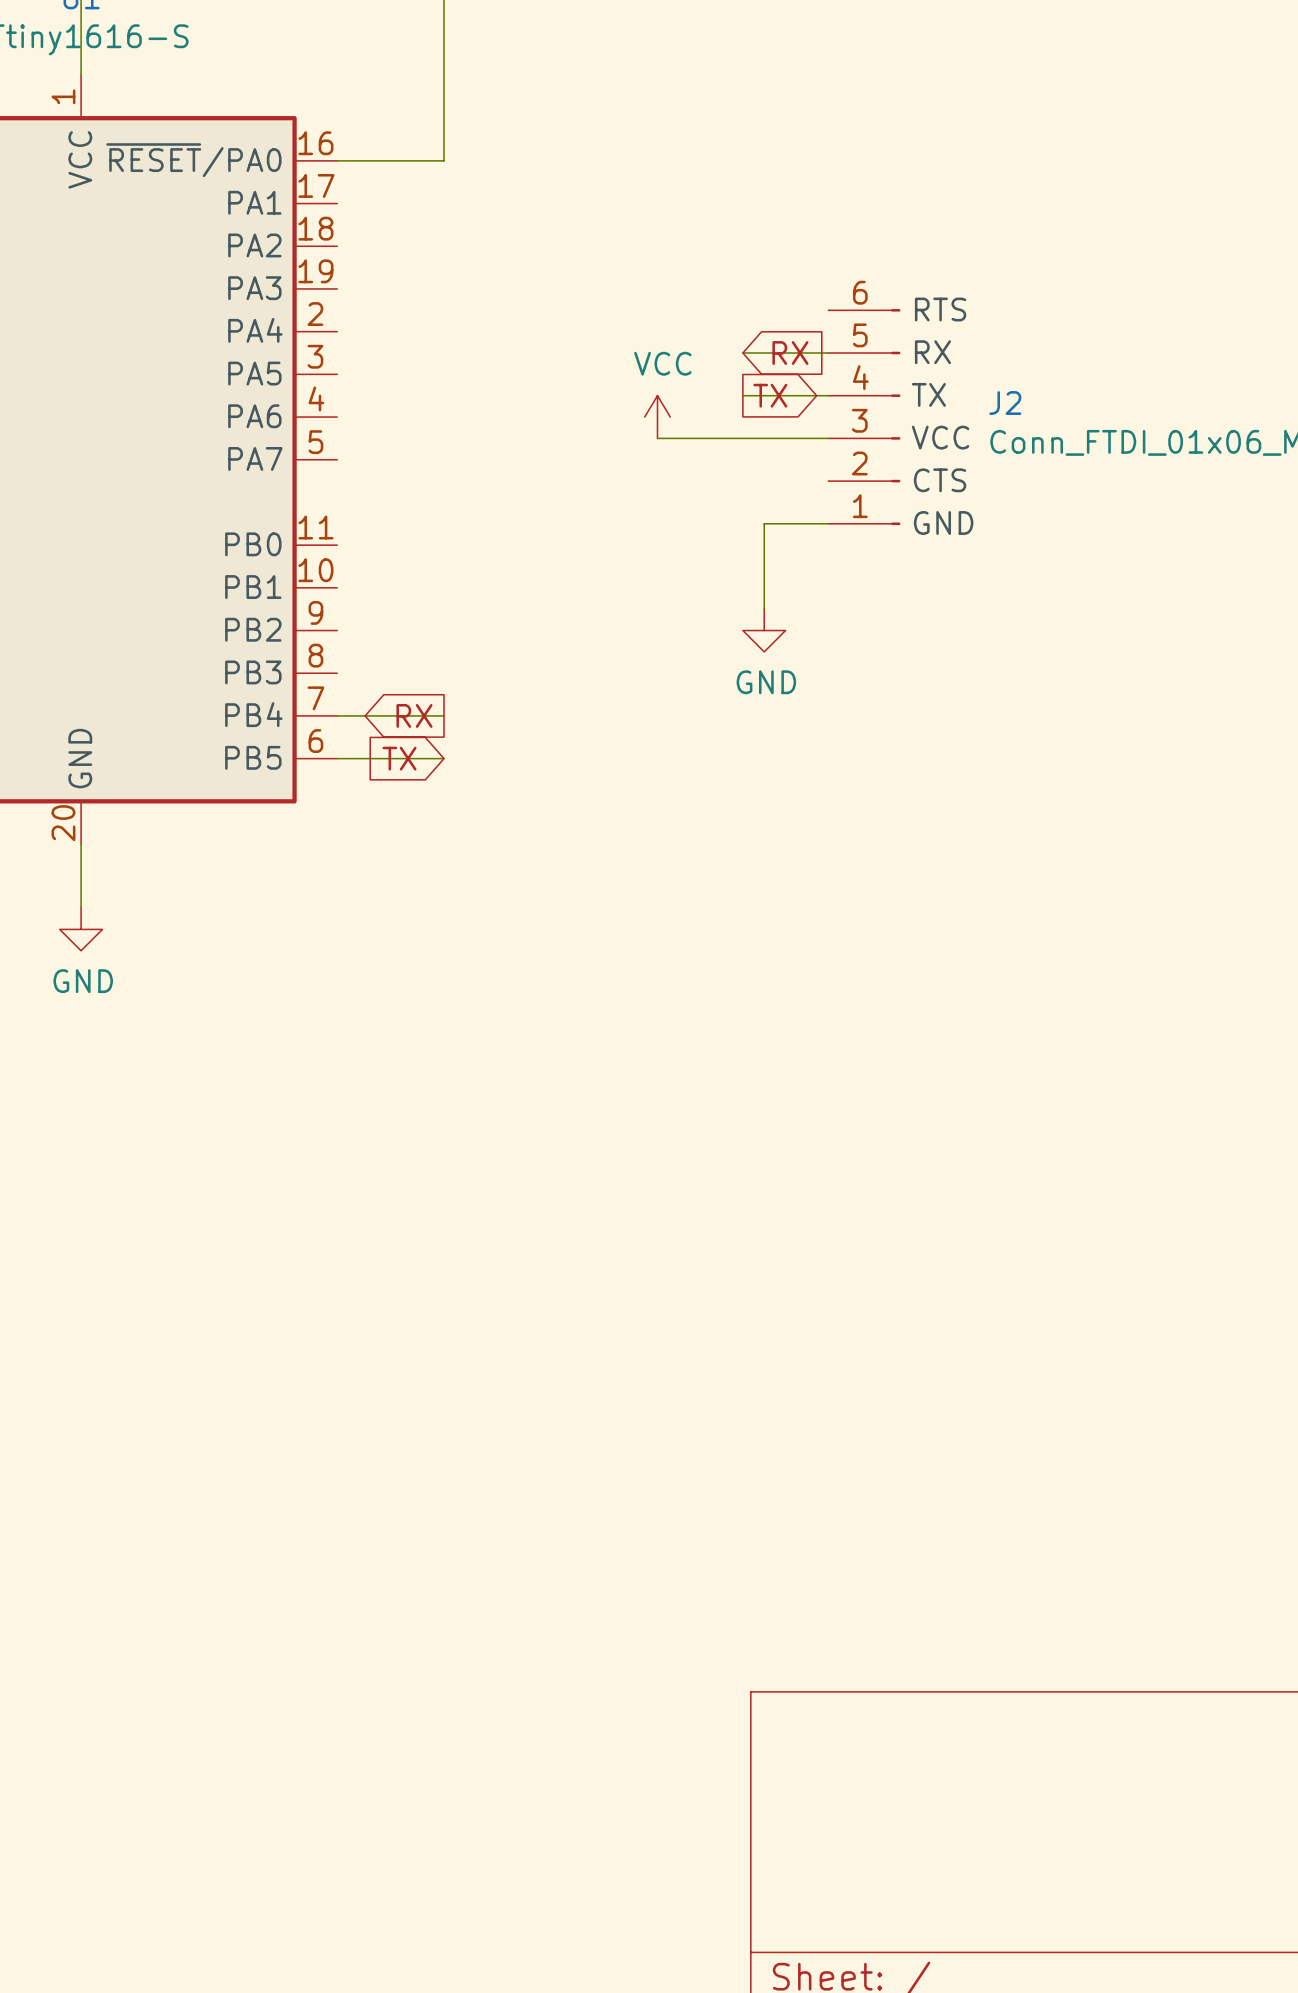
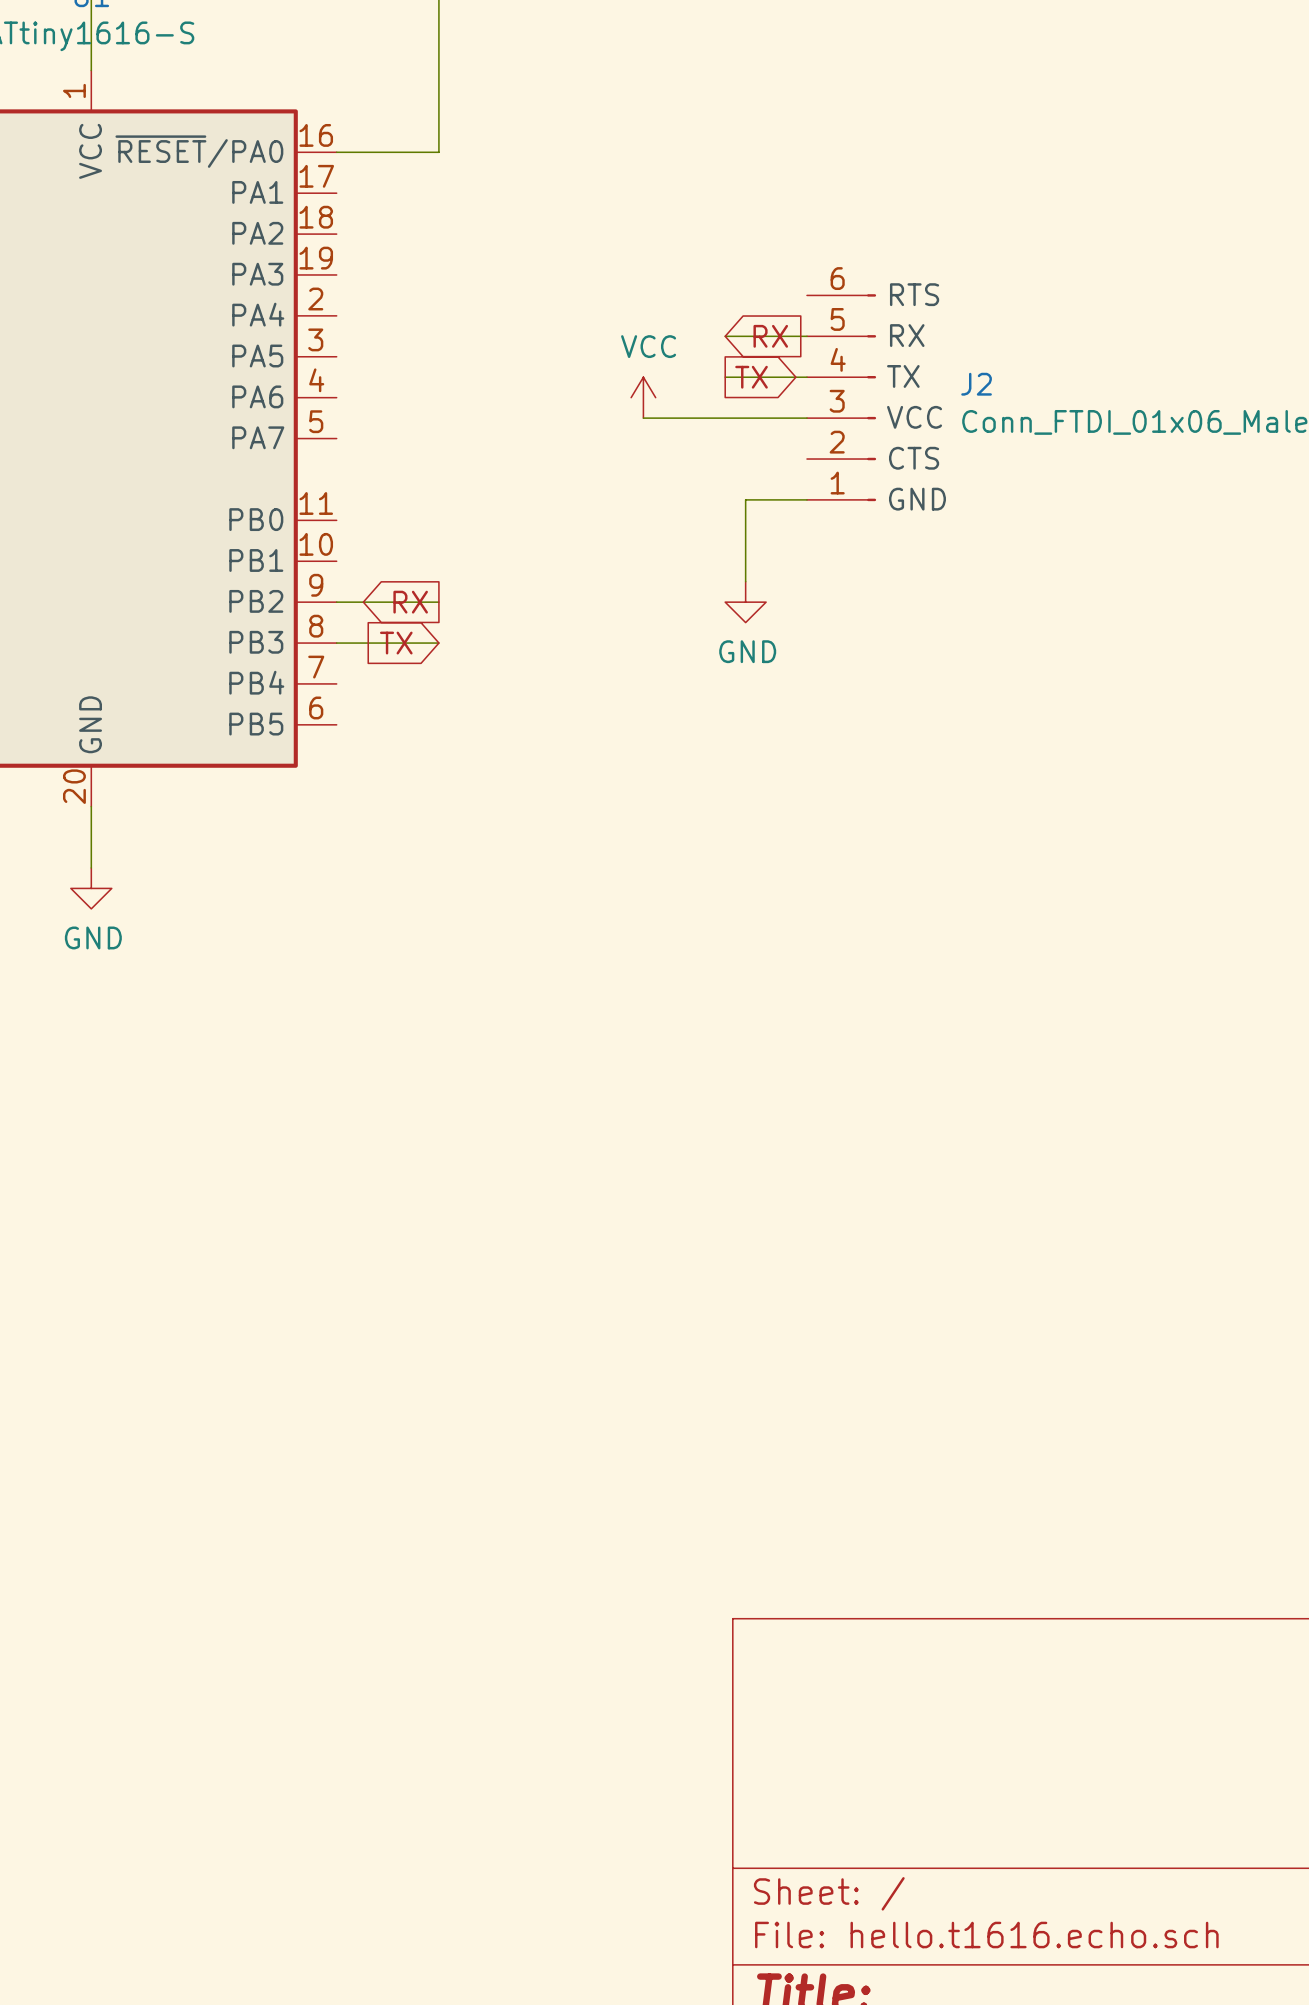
wire: (337, 715) (444, 715) -> (336, 643) (438, 643)
global label position: RX (414, 715) -> RX (410, 602)
wire: (337, 758) (444, 758) -> (336, 602) (438, 602)
global label position: TX (399, 758) -> TX (396, 643)

